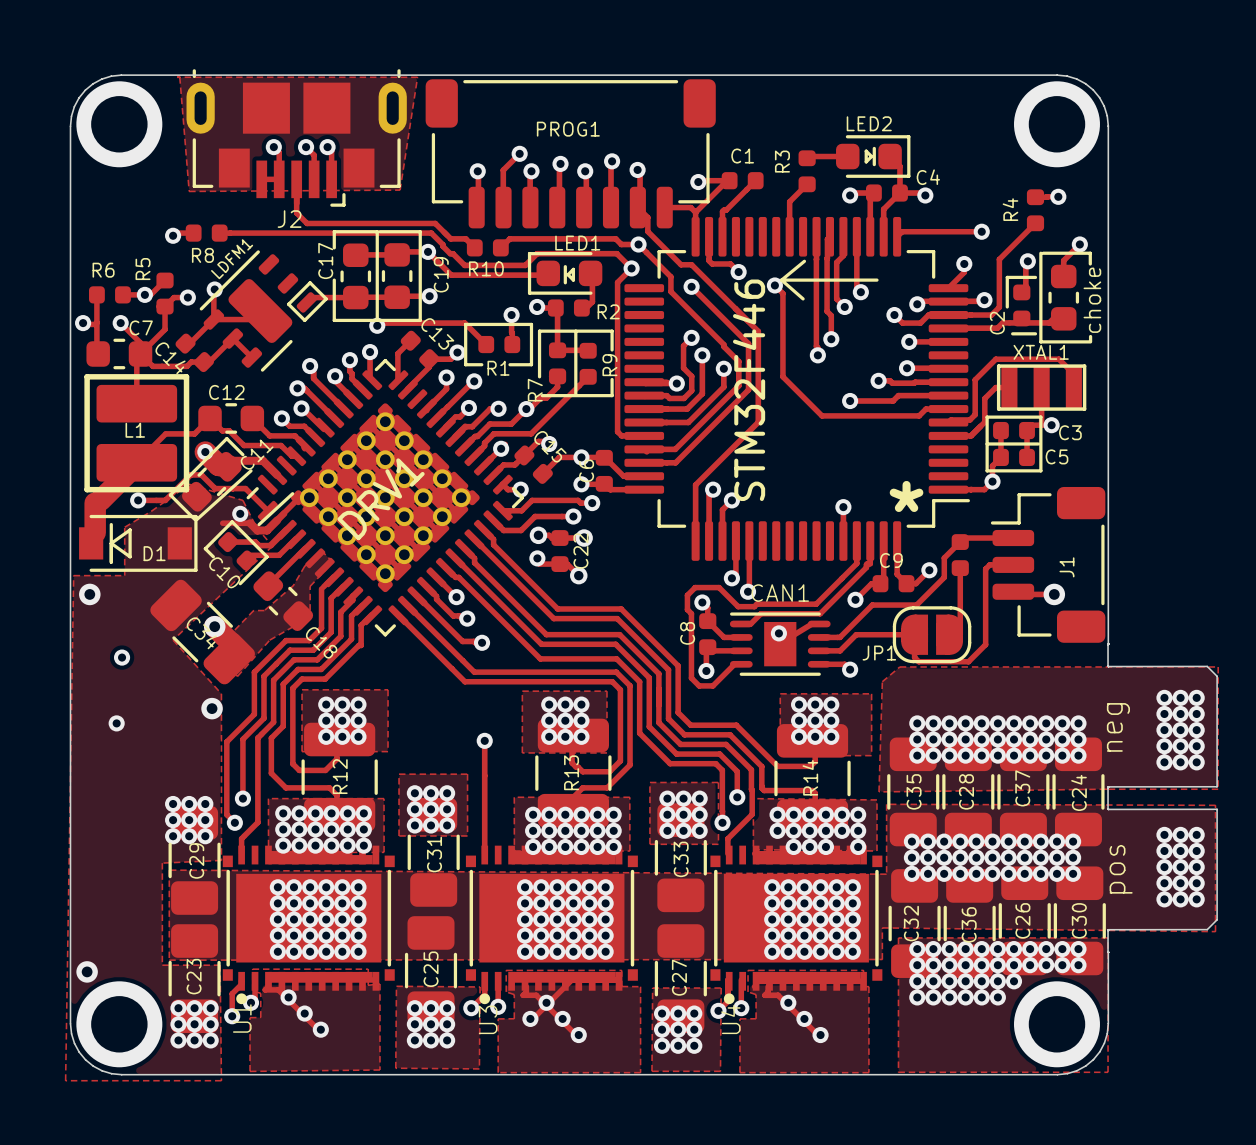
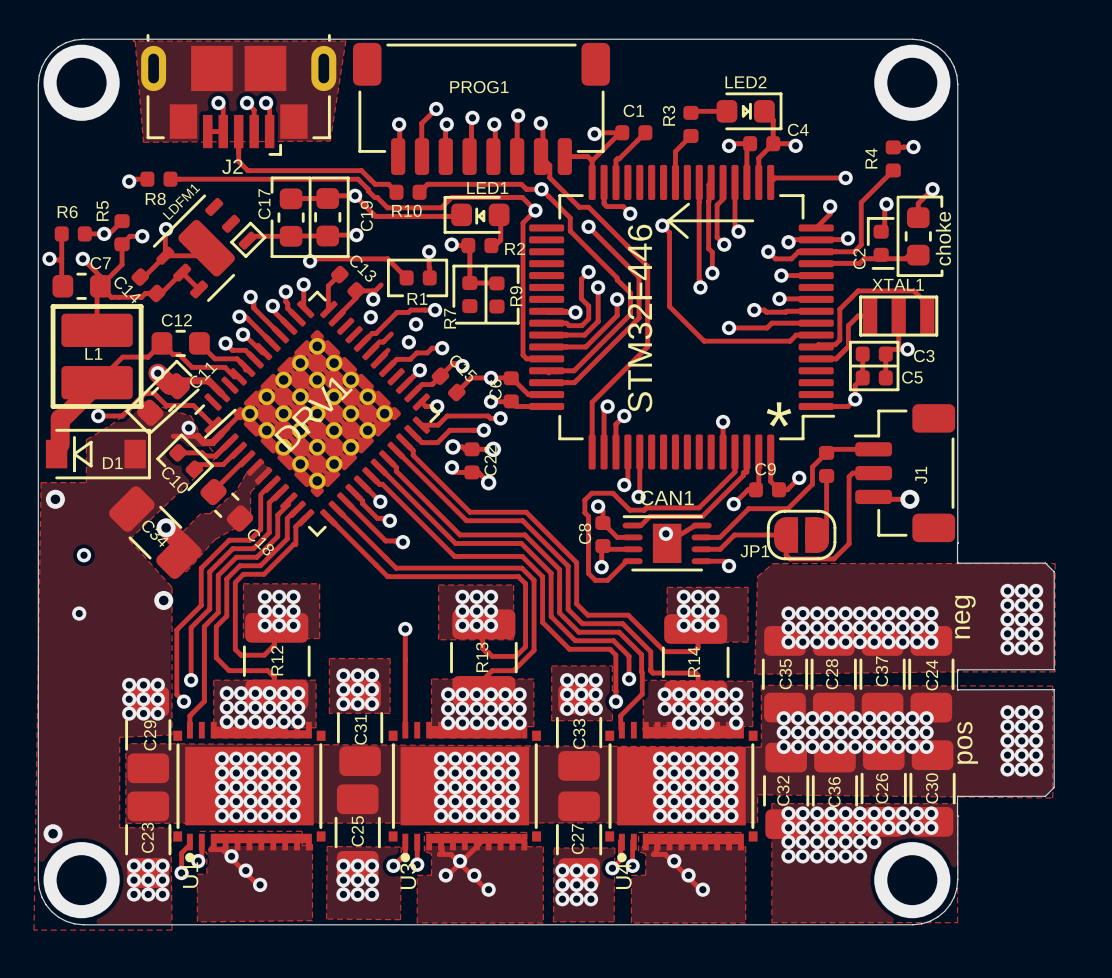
via: (457, 352) -> none
via: none -> (373, 299)
track: (551, 376) (557, 376) (557, 387) (546, 398) (540, 398) (524, 414) -> none
track: (588, 376) (531, 433) (493, 433) (474, 456) -> none
track: (446, 377) (446, 389) (426, 408) -> none
via: (446, 377) -> none
via: none -> (435, 310)
via: (474, 381) -> none
track: (473, 385) (469, 385) (447, 407) -> (435, 310) (410, 310) (408, 312) (396, 312) (375, 333) (372, 333)
via: none -> (370, 317)
via: none -> (416, 324)
via: (468, 407) -> none
track: (498, 408) (490, 408) (472, 426) (465, 426) (455, 437) -> none
via: (498, 408) -> none
track: (526, 409) (511, 424) (489, 424) (477, 436) -> (442, 348) (432, 348) (427, 352) (416, 352) (410, 359) (398, 359)
via position: (526, 409) -> (442, 348)
via: none -> (408, 342)

